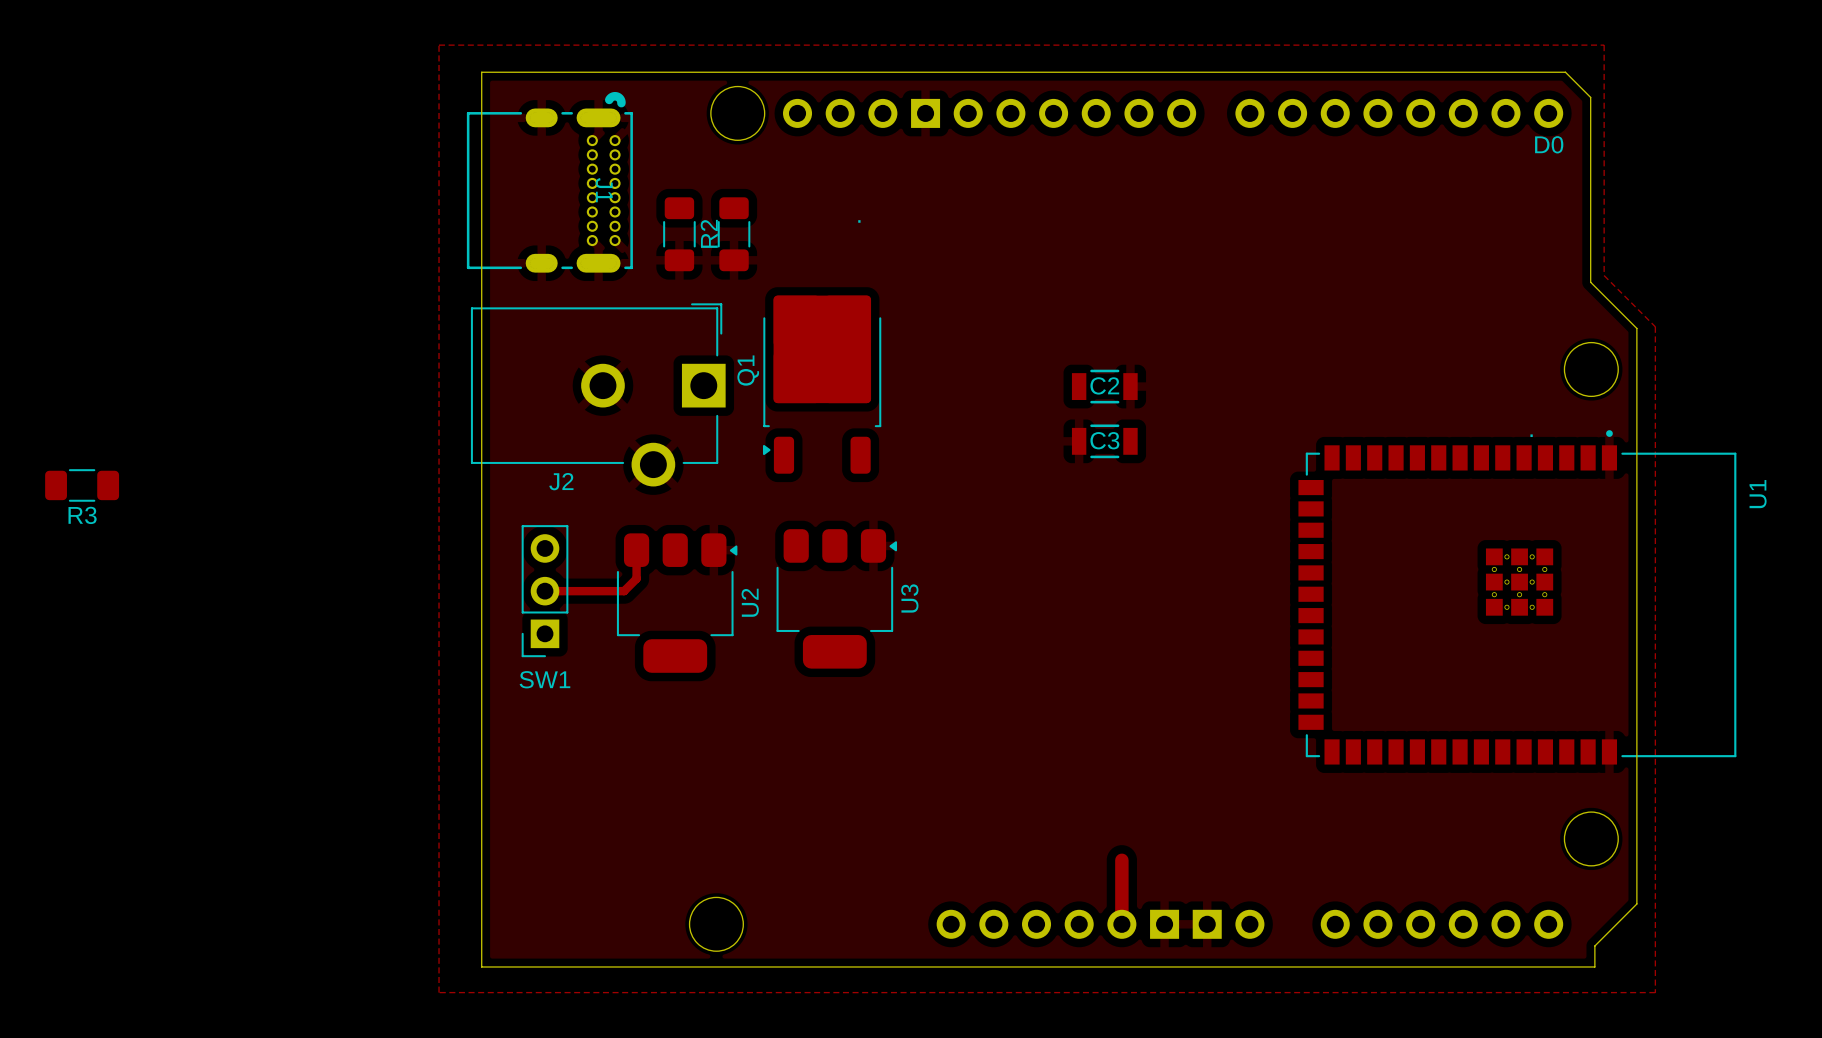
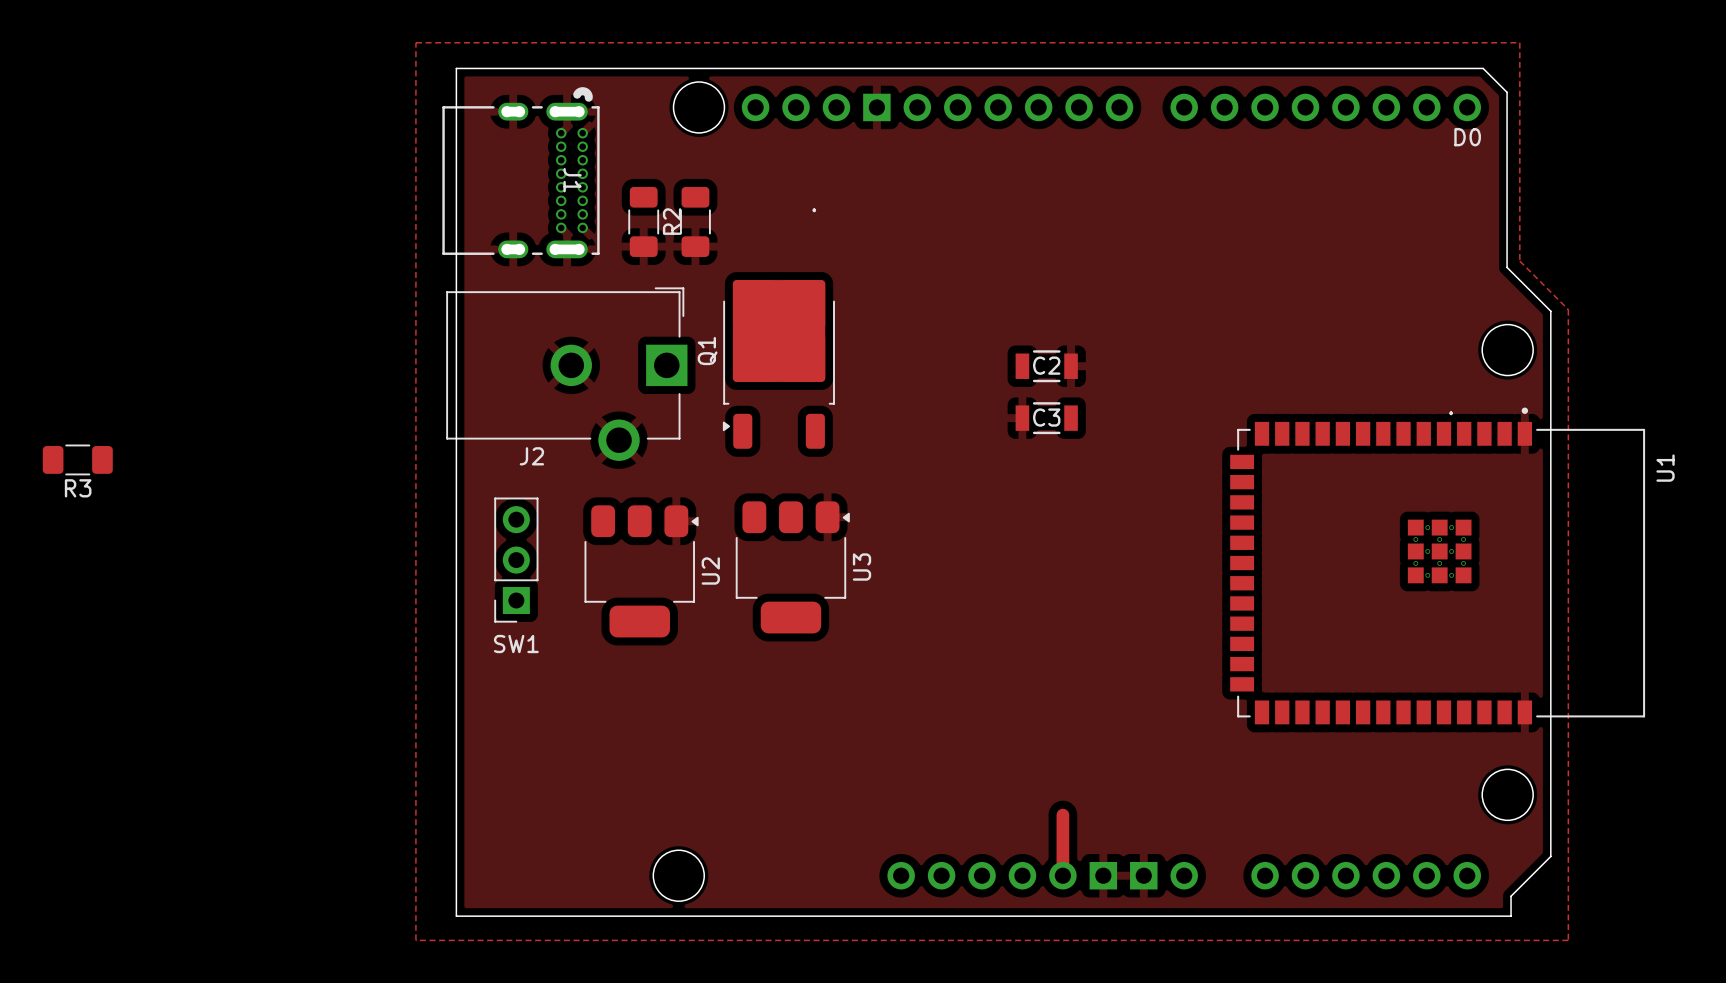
track: (636, 550) (636, 578) (624, 591) (545, 591) -> none

